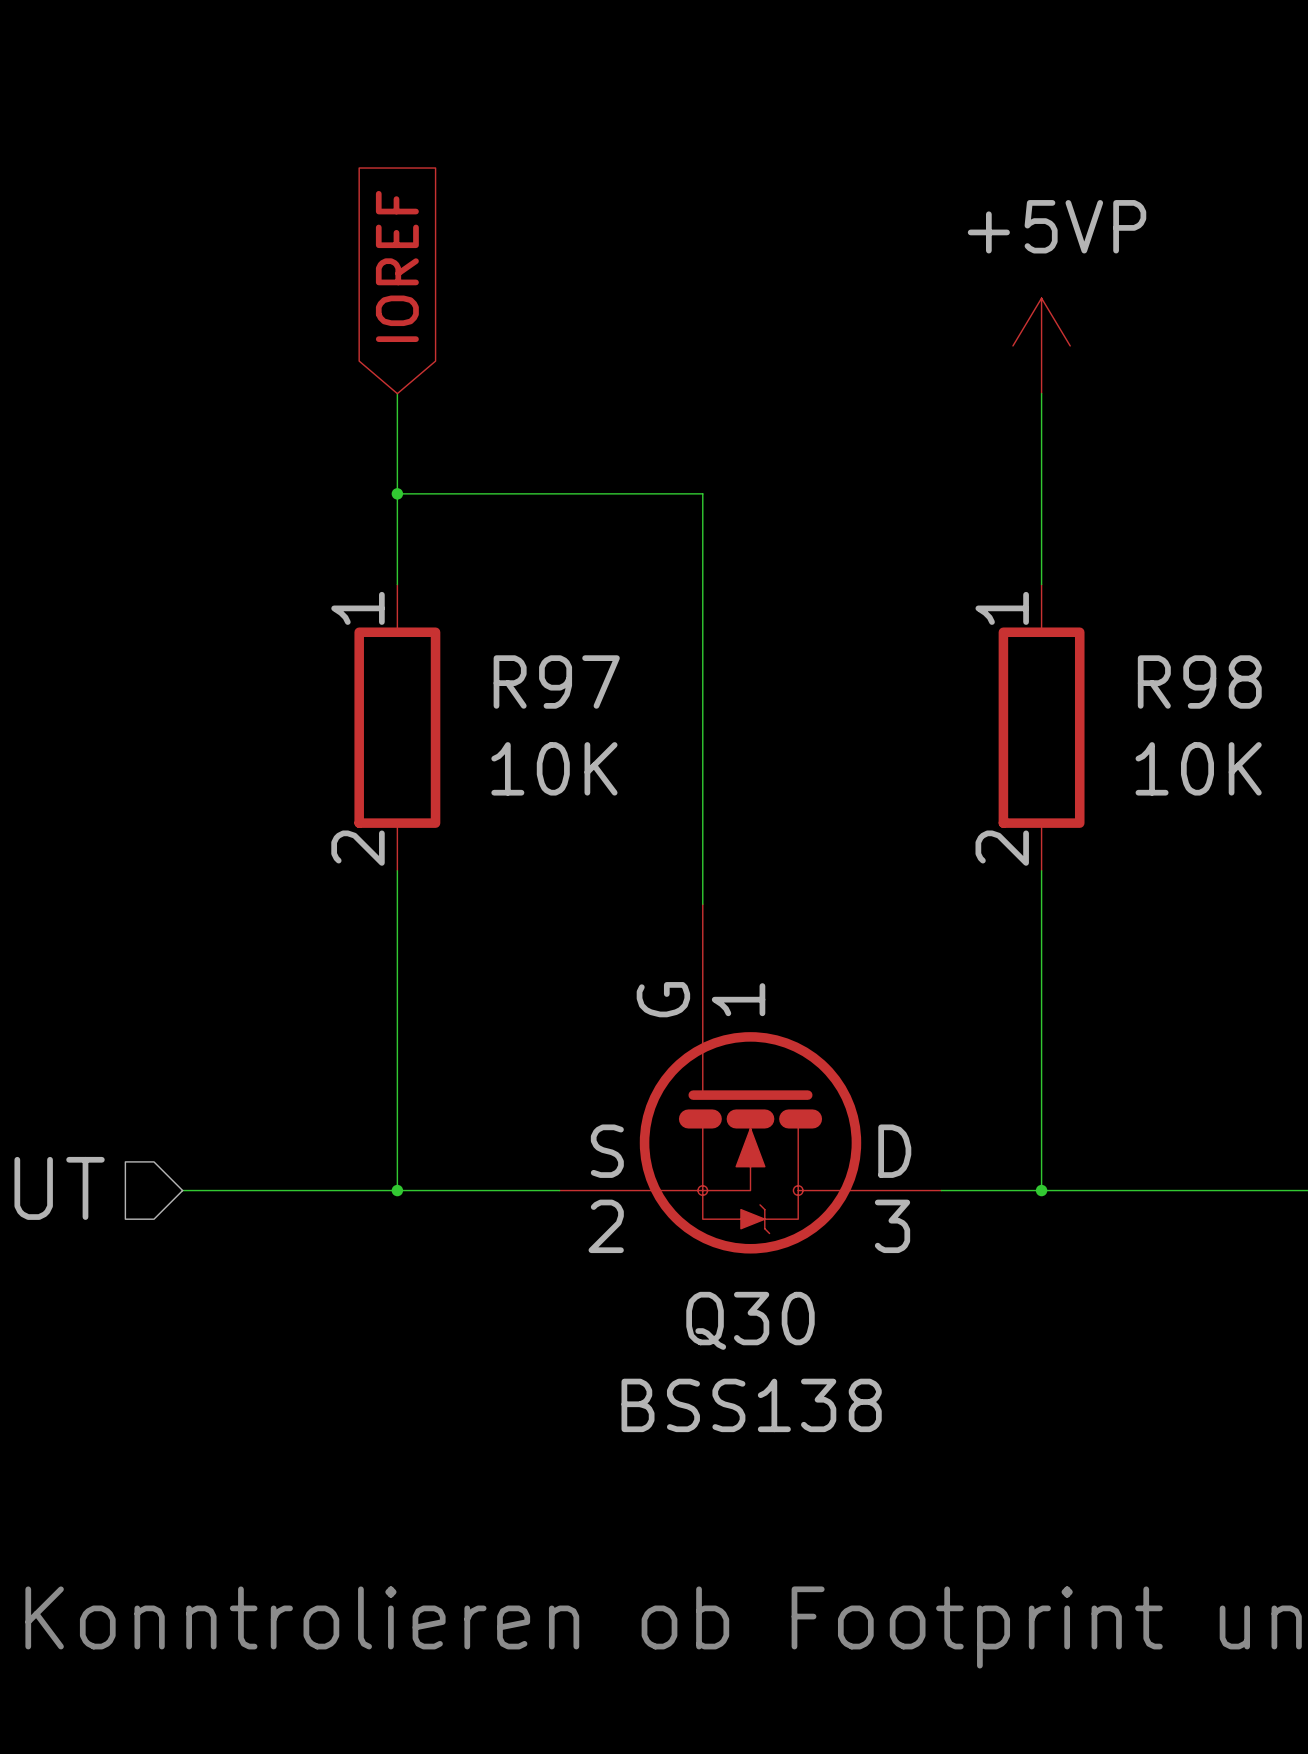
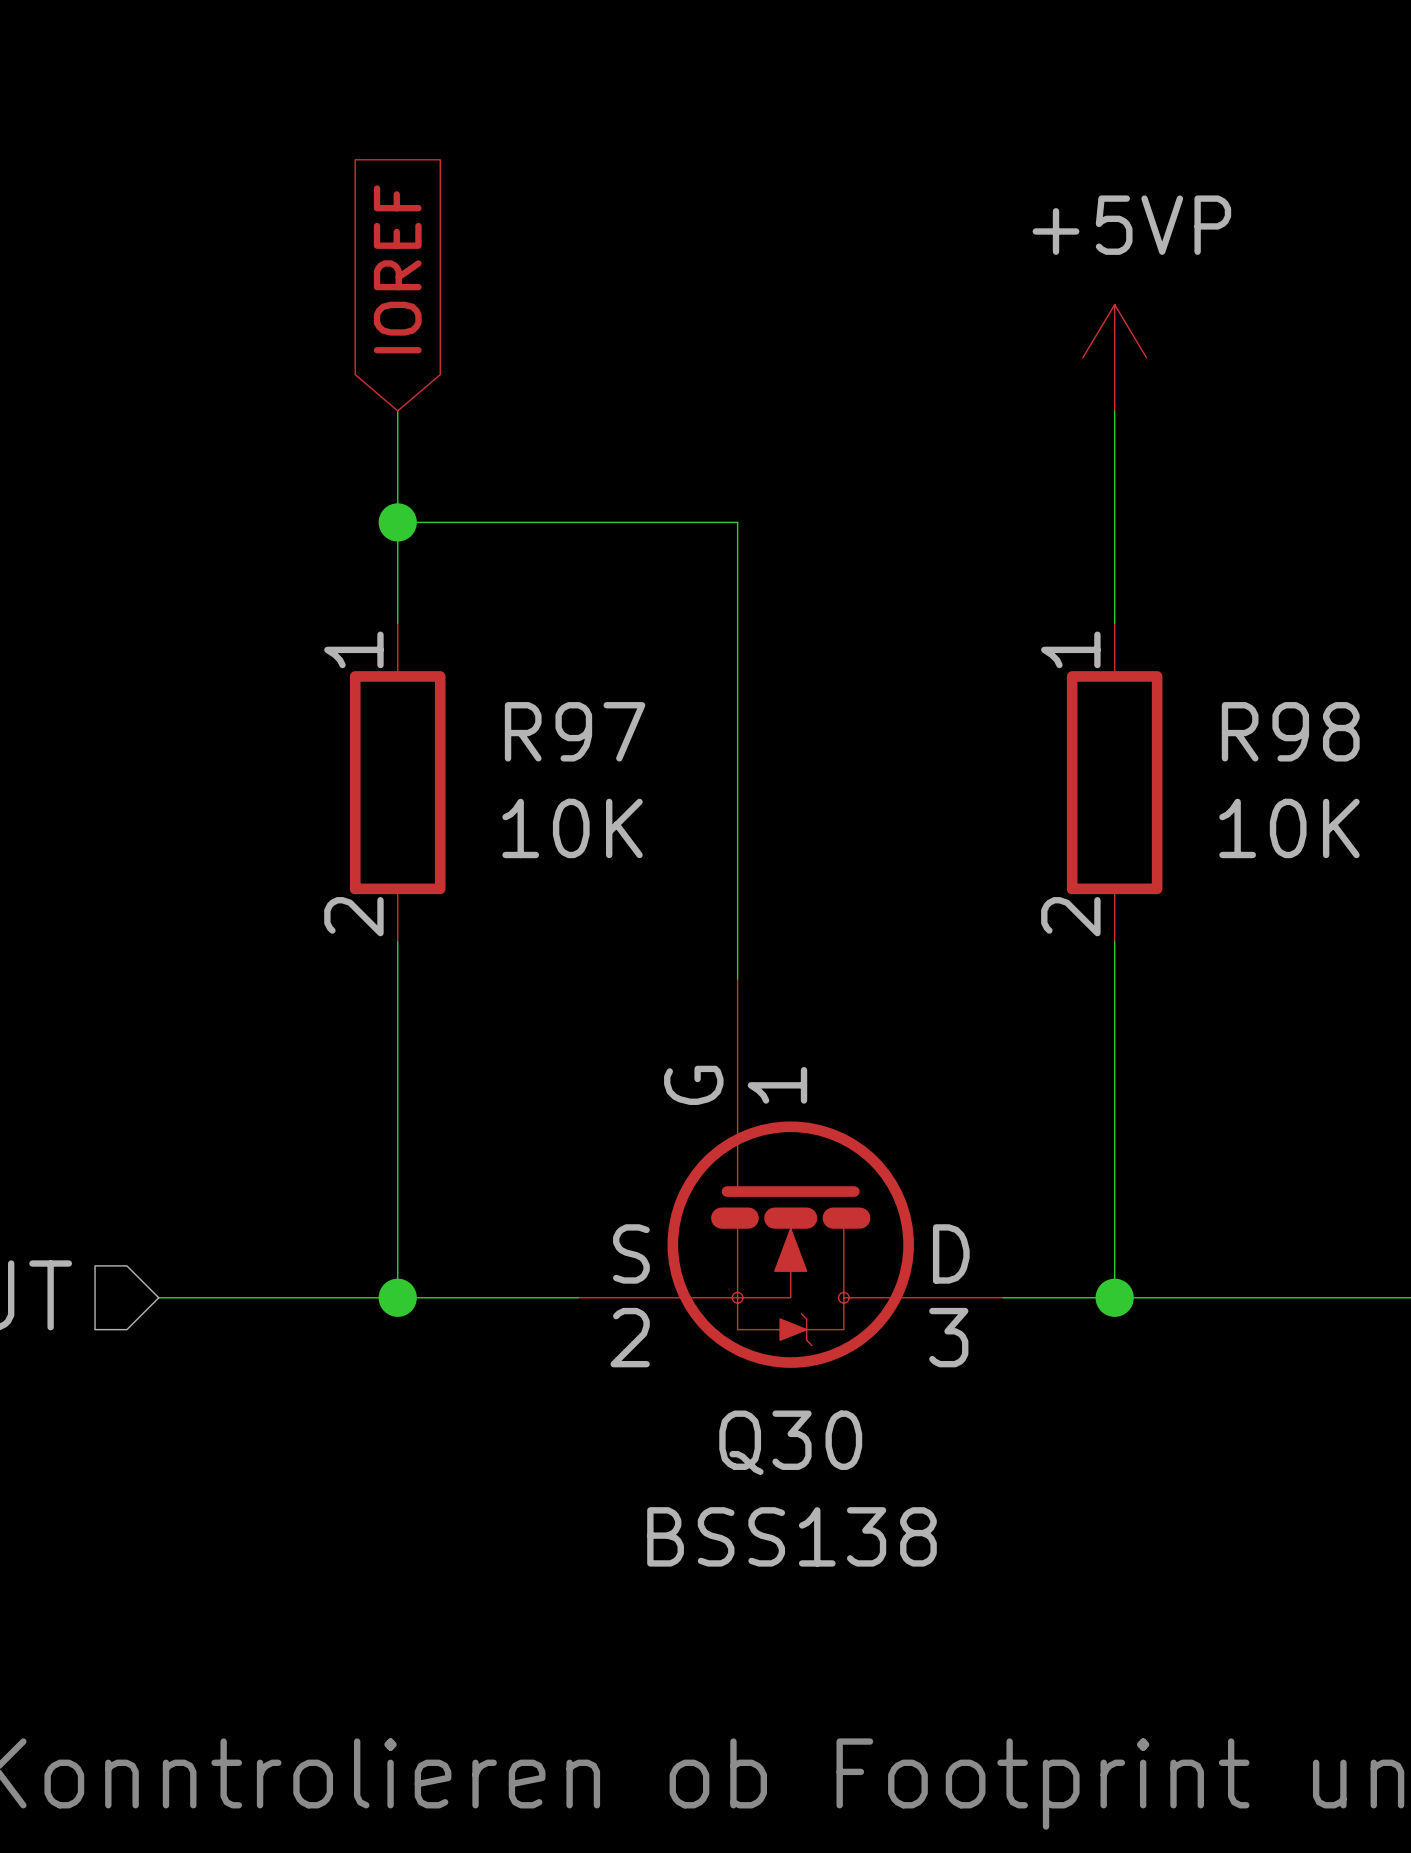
junction size: [391, 488, 404, 500] -> [378, 503, 417, 542]
junction size: [391, 1184, 404, 1197] -> [378, 1278, 417, 1317]
junction size: [1035, 1184, 1048, 1197] -> [1095, 1278, 1134, 1317]

